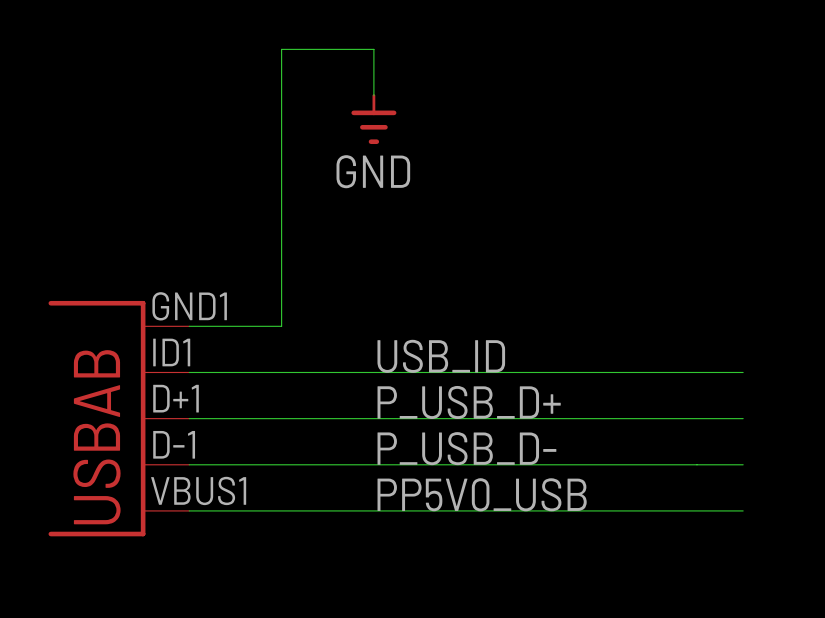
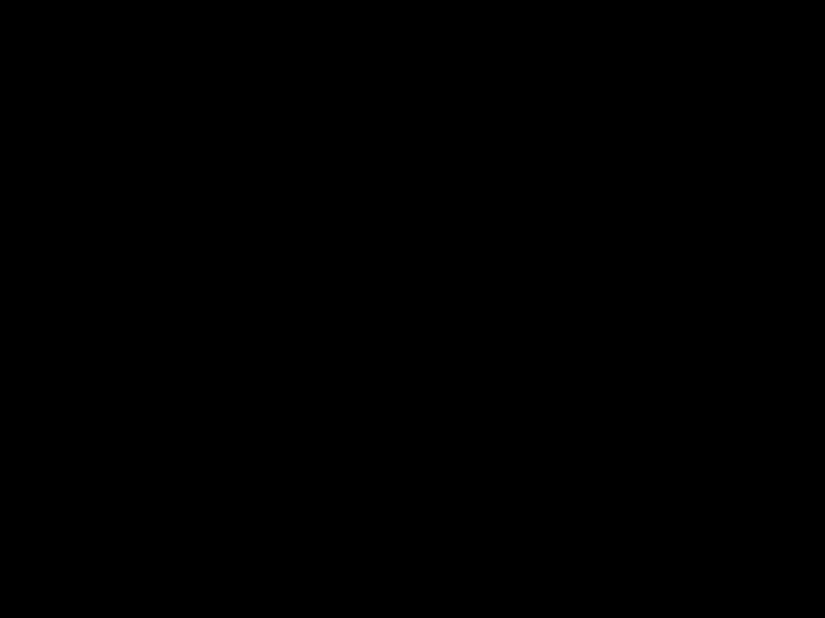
wire: (373, 95) (373, 49) (281, 49) (281, 326) (189, 326) -> none
power symbol: GND (373, 119) -> none
label: USB_ID (441, 356) -> none
wire: (189, 372) (743, 372) -> none
label: P_USB_D+ (469, 402) -> none
part: (118, 418) -> none
wire: (189, 418) (743, 418) -> none
label: P_USB_D- (466, 448) -> none
wire: (189, 464) (743, 464) -> none
label: PP5V0_USB (482, 494) -> none
wire: (189, 510) (743, 510) -> none

